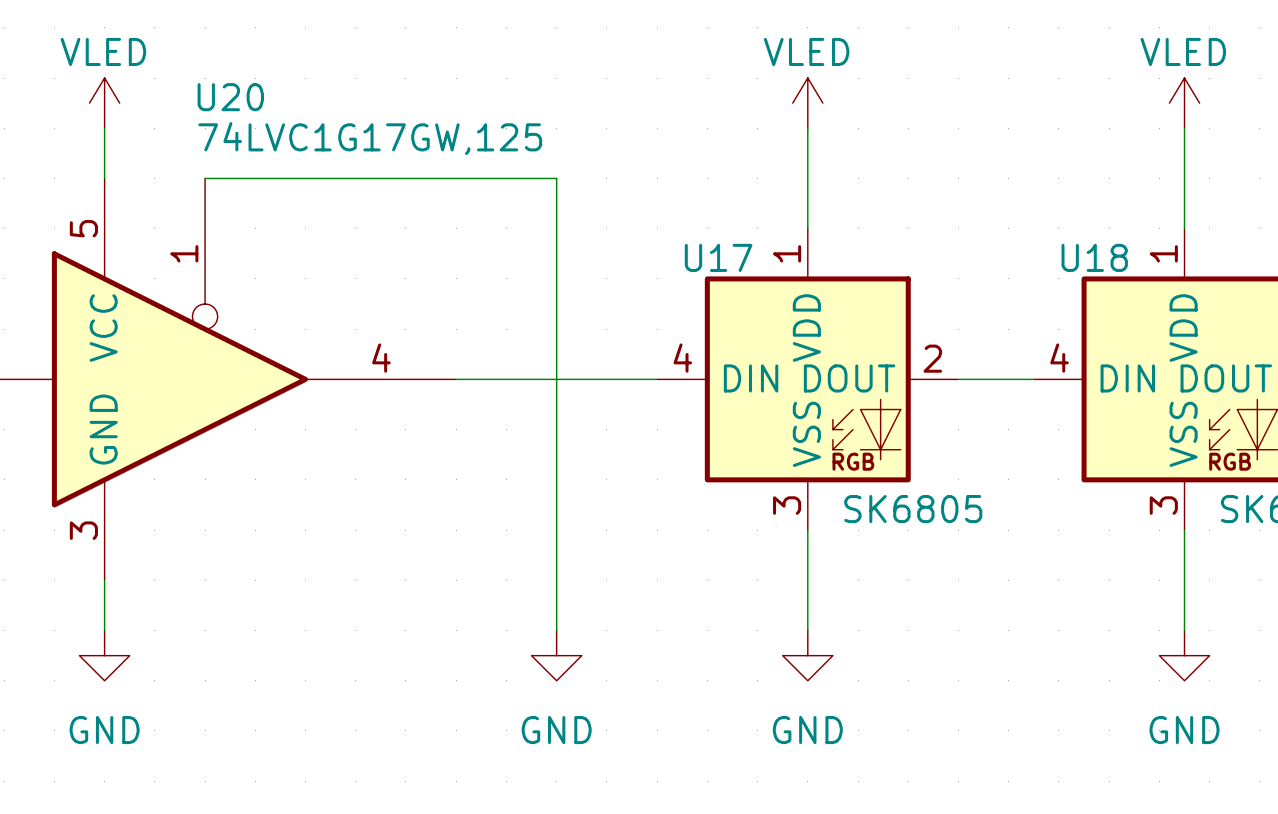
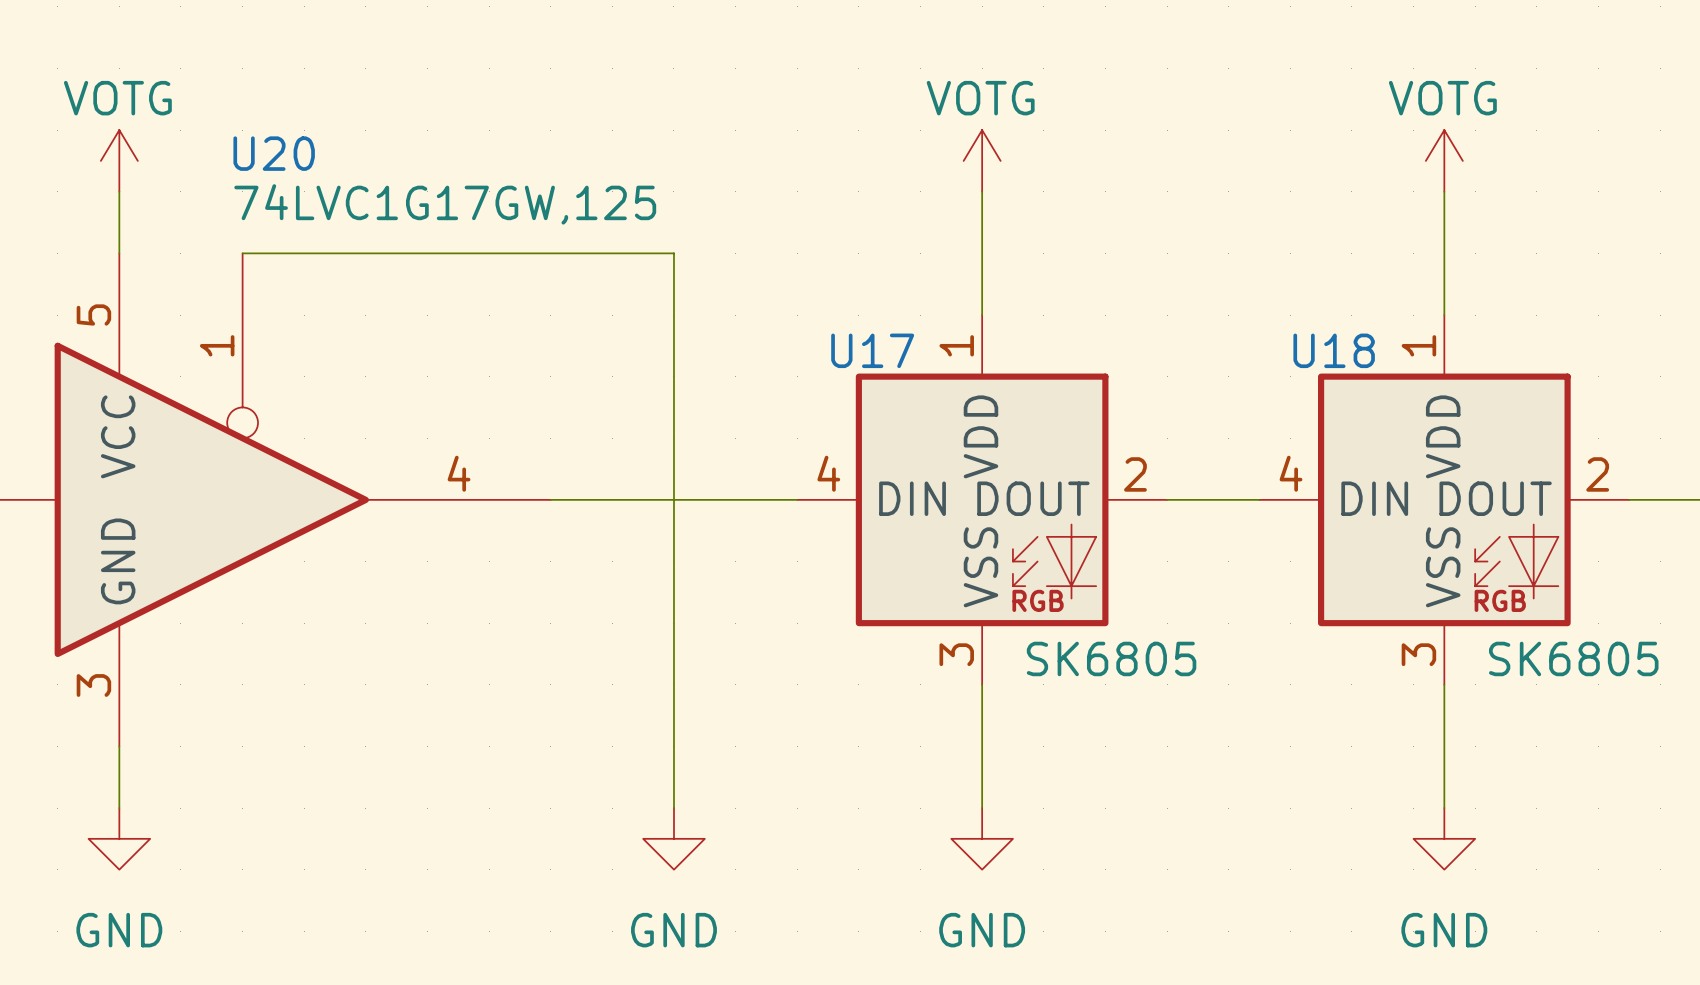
power symbol: VLED (104, 103) -> VOTG (119, 160)
power symbol: VLED (807, 103) -> VOTG (982, 160)
power symbol: VLED (1184, 103) -> VOTG (1444, 160)

